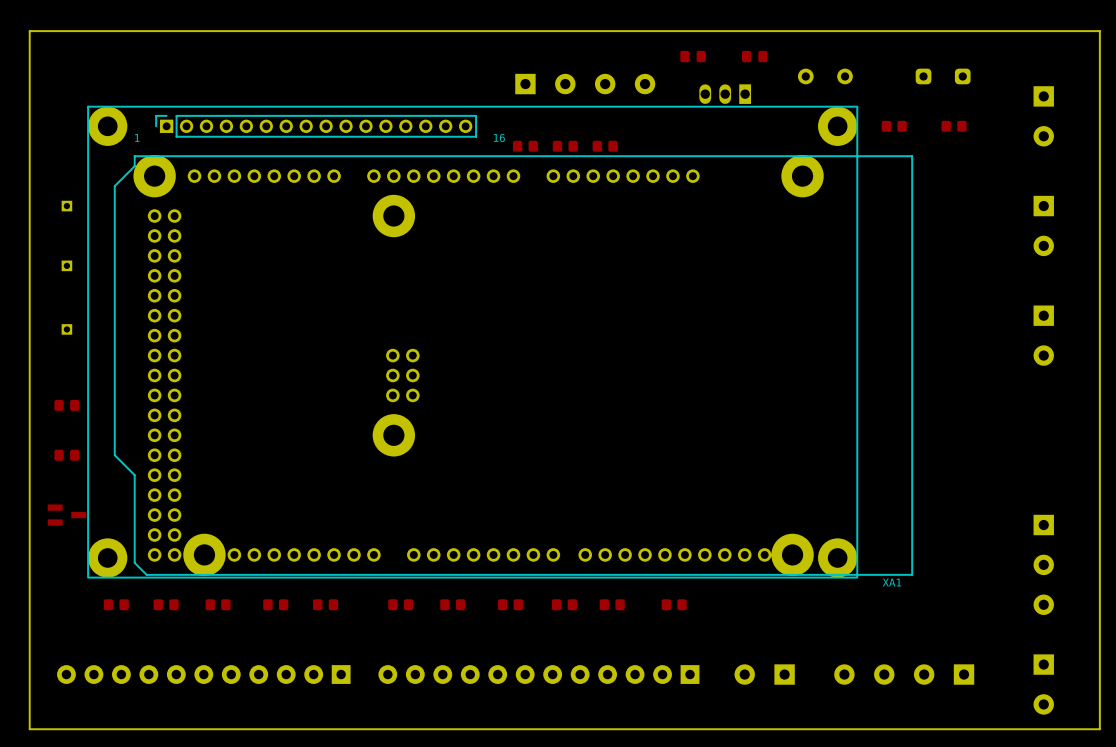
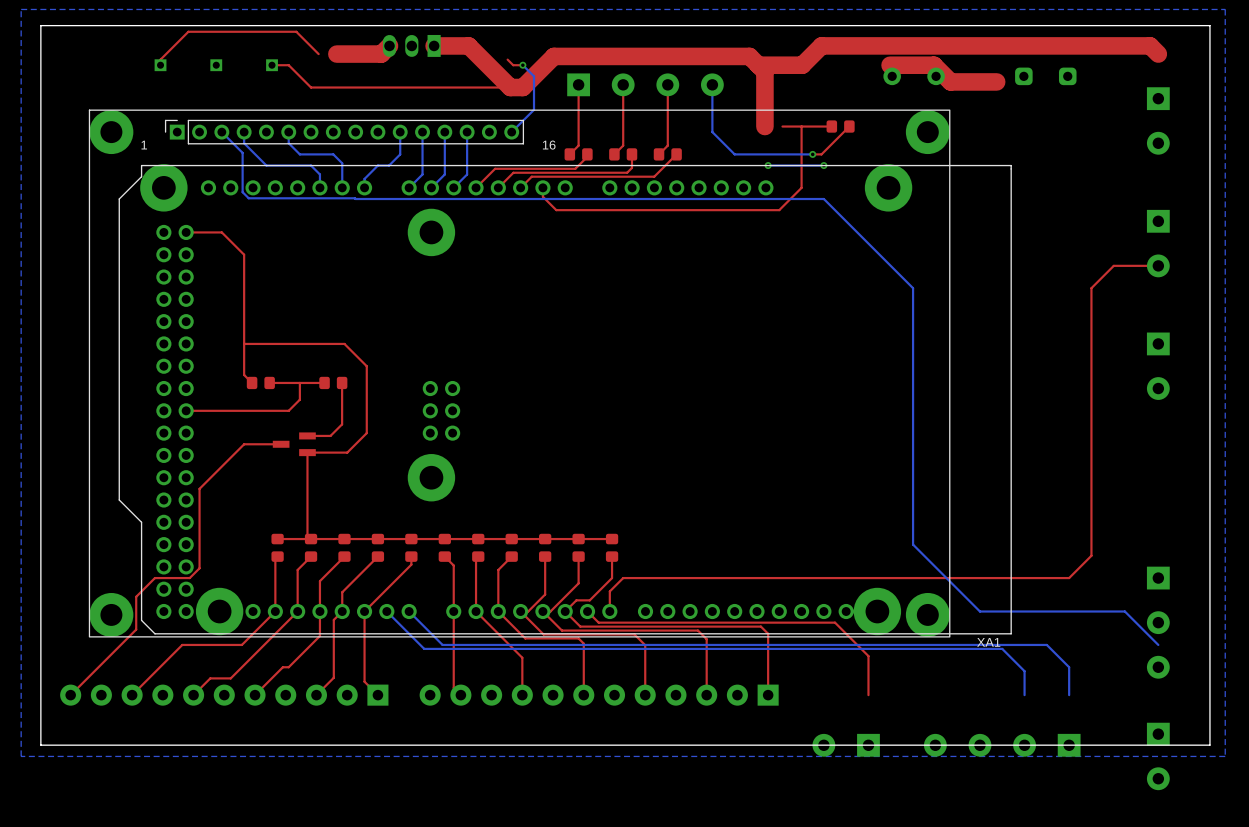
bottom zone outline: none -> (1225, 9) (1225, 756) (21, 756) (21, 9) (1225, 9)
board edge: (1089, 31) (1099, 31) (1099, 729) (29, 729) (29, 31) (44, 31) -> (1209, 25) (1209, 745) (40, 745) (40, 25)
top track: none -> (389, 45) (381, 54) (336, 54)
part: none -> (411, 45)
top track: none -> (434, 45) (468, 45) (510, 87)
top track: none -> (318, 54) (296, 31) (188, 31) (160, 59) (160, 65)
part: (693, 56) -> none
part: (754, 56) -> none
top track: none -> (1158, 54) (1150, 45) (821, 45) (802, 65) (758, 65)
top track: none -> (507, 59) (513, 65) (522, 65)
part: none -> (160, 65)
part: none -> (216, 65)
top track: none -> (272, 65) (288, 65) (311, 87) (510, 87)
part: none -> (272, 65)
bottom track: none -> (522, 65) (534, 76) (534, 109) (511, 132)
via: none -> (522, 65)
top track: none -> (890, 65) (933, 65) (950, 81) (996, 81)
top track: none -> (578, 84) (578, 145) (569, 154)
top track: none -> (623, 84) (623, 145) (614, 154)
top track: none -> (667, 84) (667, 145) (659, 154)
bottom track: none -> (712, 84) (712, 132) (734, 154) (812, 154)
top track: none -> (510, 87) (522, 87) (553, 56) (749, 56) (764, 71) (764, 126)
part: (725, 94) -> none
top track: none -> (801, 126) (801, 187) (779, 210) (556, 210) (542, 196) (542, 187)
top track: none -> (831, 126) (782, 126)
part: none -> (840, 126)
top track: none -> (849, 126) (821, 154) (812, 154)
bottom track: none -> (221, 132) (242, 152) (242, 192) (248, 198) (823, 199) (913, 288) (913, 544) (979, 611) (1124, 611) (1158, 644)
bottom track: none -> (244, 132) (244, 143) (266, 165) (311, 165) (319, 174) (319, 187)
bottom track: none -> (288, 132) (288, 143) (299, 154) (333, 154) (342, 163) (342, 187)
bottom track: none -> (400, 132) (400, 154) (389, 165) (377, 165) (364, 178) (364, 187)
bottom track: none -> (422, 132) (422, 174) (409, 187)
bottom track: none -> (444, 132) (444, 174) (431, 187)
bottom track: none -> (467, 132) (467, 174) (453, 187)
part: (894, 126) -> none
part: (954, 126) -> none
top track: none -> (587, 154) (587, 156) (575, 168) (495, 168) (476, 187)
top track: none -> (631, 154) (631, 167) (627, 172) (513, 172) (498, 187)
top track: none -> (676, 154) (654, 176) (531, 176) (520, 187)
via: none -> (812, 154)
via: none -> (768, 165)
bottom track: none -> (823, 165) (768, 165)
via: none -> (823, 165)
part: (66, 206) -> none
top track: none -> (186, 232) (221, 232) (244, 254) (244, 375) (252, 382)
top track: none -> (1158, 265) (1113, 265) (1091, 288) (1091, 555) (1069, 578) (623, 578) (609, 591) (609, 611)
part: (66, 265) -> none
top track: none -> (244, 343) (344, 343) (366, 366) (366, 433) (347, 452) (307, 452) (307, 535) (311, 539)
part: (66, 329) -> none
part: none -> (260, 382)
top track: none -> (299, 382) (299, 399) (288, 410) (186, 410)
top track: none -> (324, 382) (269, 382)
part: none -> (333, 382)
top track: none -> (342, 382) (342, 424) (330, 435) (307, 435)
part: (66, 405) -> none
top track: none -> (281, 444) (244, 444) (199, 488) (199, 568) (189, 578) (154, 578) (136, 596) (136, 629) (70, 695)
part: none -> (294, 444)
part: (66, 455) -> none
top track: none -> (612, 539) (277, 539)
part: none -> (277, 547)
part: none -> (311, 547)
part: none -> (344, 547)
part: none -> (377, 547)
part: none -> (411, 547)
part: none -> (444, 547)
part: none -> (478, 547)
part: none -> (511, 547)
part: none -> (545, 547)
part: none -> (578, 547)
part: none -> (612, 547)
top track: none -> (277, 556) (275, 558) (275, 611) (241, 644) (182, 644) (132, 695)
top track: none -> (311, 556) (297, 569) (297, 611) (230, 678) (210, 678) (193, 695)
top track: none -> (344, 556) (319, 581) (319, 636) (288, 667) (282, 667) (255, 695)
top track: none -> (377, 556) (342, 592) (342, 611) (333, 619) (333, 677) (316, 695)
top track: none -> (411, 556) (411, 564) (364, 611) (364, 681) (377, 695)
top track: none -> (444, 556) (453, 565) (453, 687) (460, 695)
top track: none -> (478, 556) (476, 558) (476, 611) (522, 657) (522, 695)
top track: none -> (511, 556) (498, 569) (498, 611) (525, 638) (578, 638) (583, 643) (583, 695)
top track: none -> (545, 556) (545, 594) (528, 611) (520, 611) (543, 634) (634, 634) (645, 645) (645, 695)
top track: none -> (578, 556) (578, 583) (550, 611) (542, 611) (561, 630) (697, 630) (706, 639) (706, 695)
top track: none -> (612, 556) (612, 578) (589, 600) (576, 600) (565, 611) (580, 626) (760, 626) (768, 633) (768, 695)
part: (66, 515) -> none
bottom track: none -> (386, 611) (424, 648) (1002, 648) (1024, 671) (1024, 695)
bottom track: none -> (409, 611) (442, 644) (1046, 644) (1069, 667) (1069, 695)
top track: none -> (587, 611) (598, 622) (835, 622) (868, 656) (868, 695)
part: (116, 604) -> none
part: (166, 604) -> none
part: (218, 604) -> none
part: (275, 604) -> none
part: (325, 604) -> none
part: (400, 604) -> none
part: (452, 604) -> none
part: (510, 604) -> none
part: (564, 604) -> none
part: (612, 604) -> none
part: (674, 604) -> none
part position: (203, 674) -> (224, 695)
part position: (538, 674) -> (599, 695)

